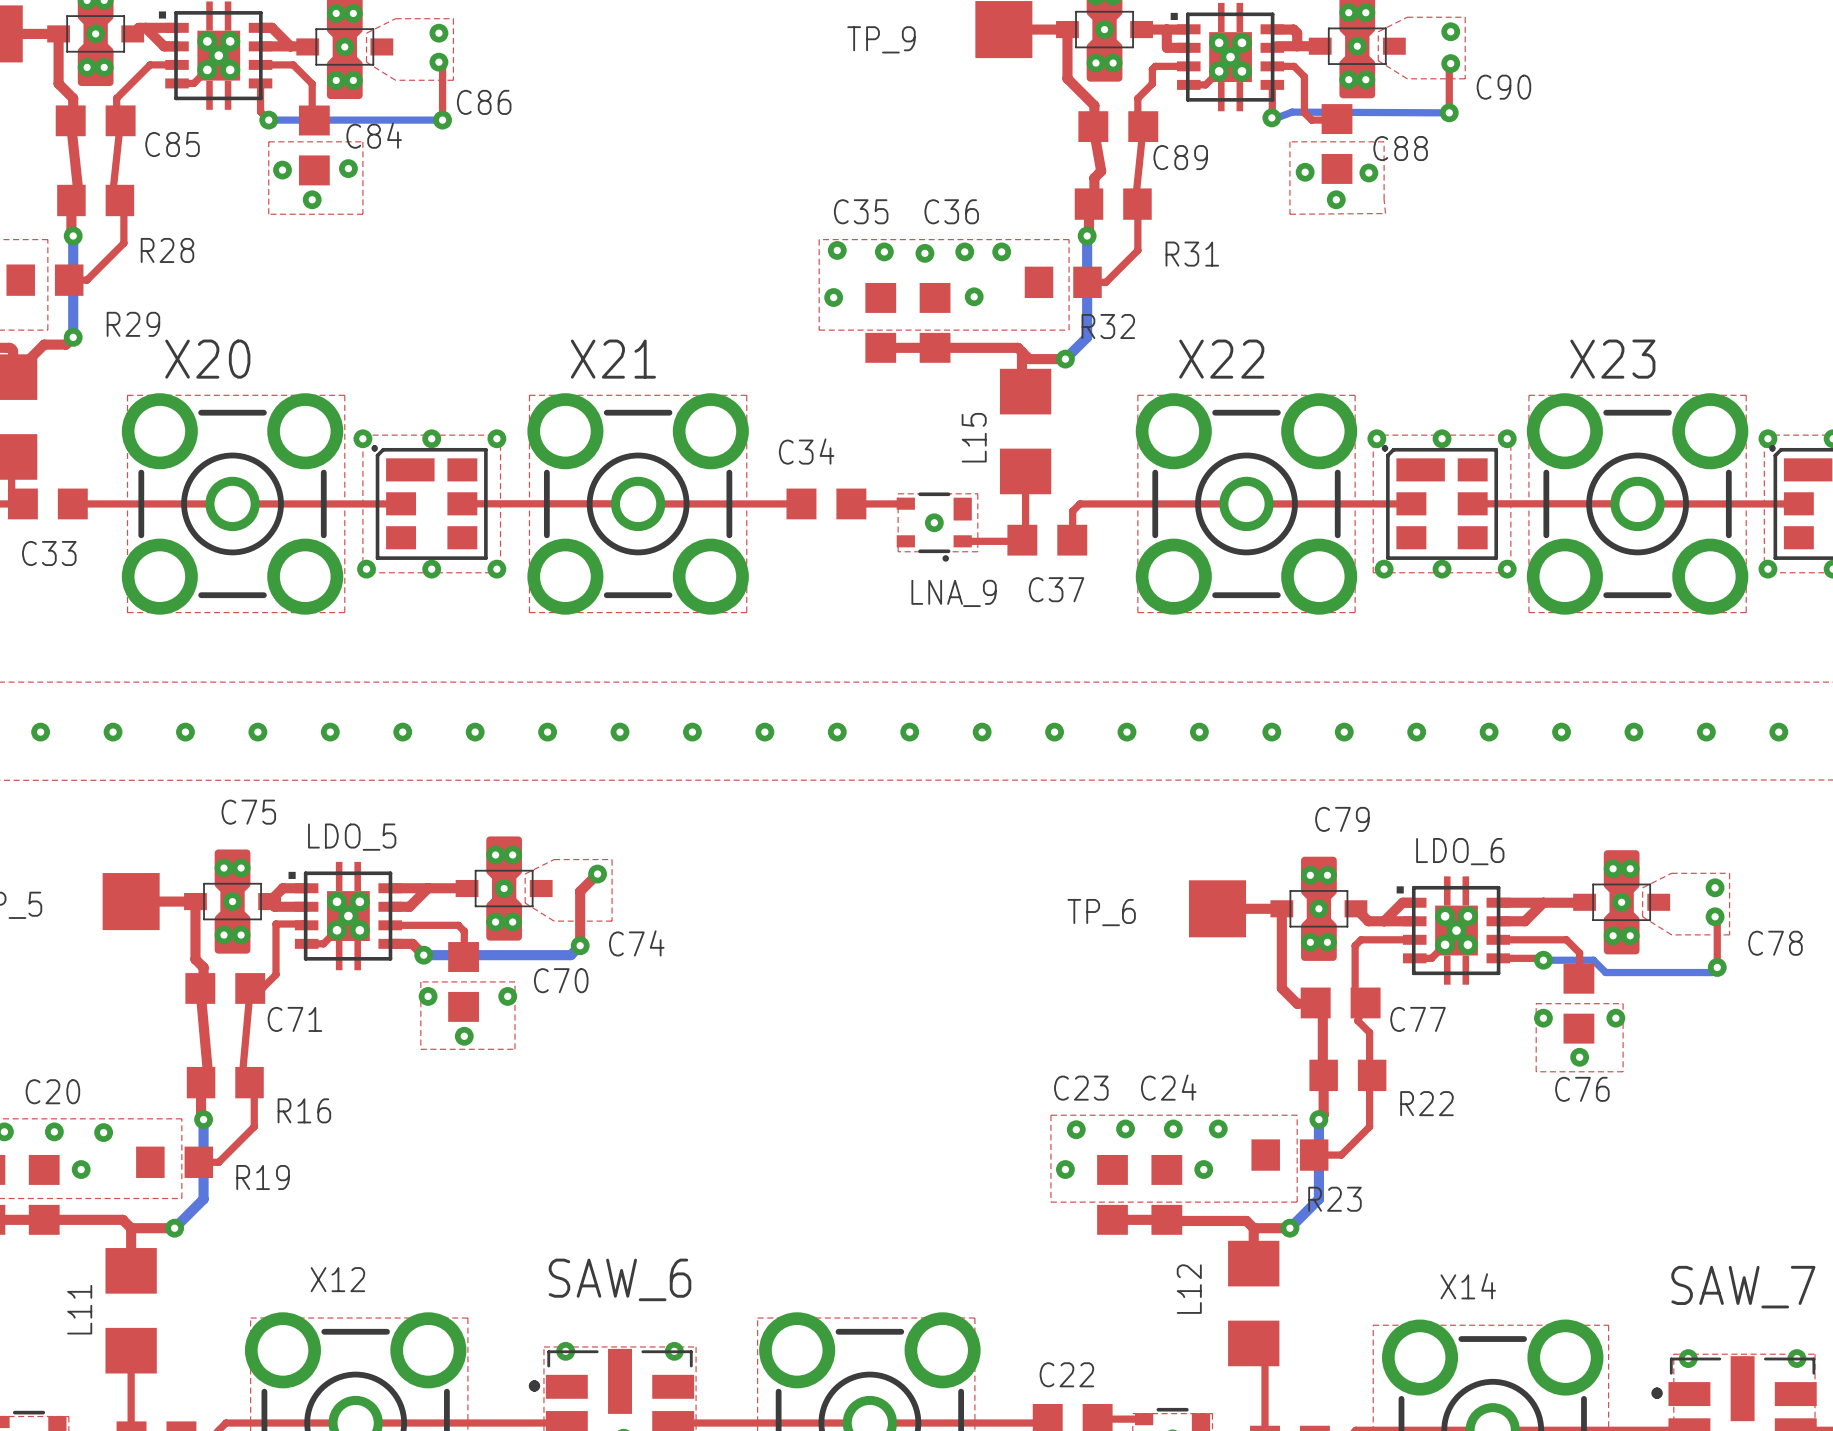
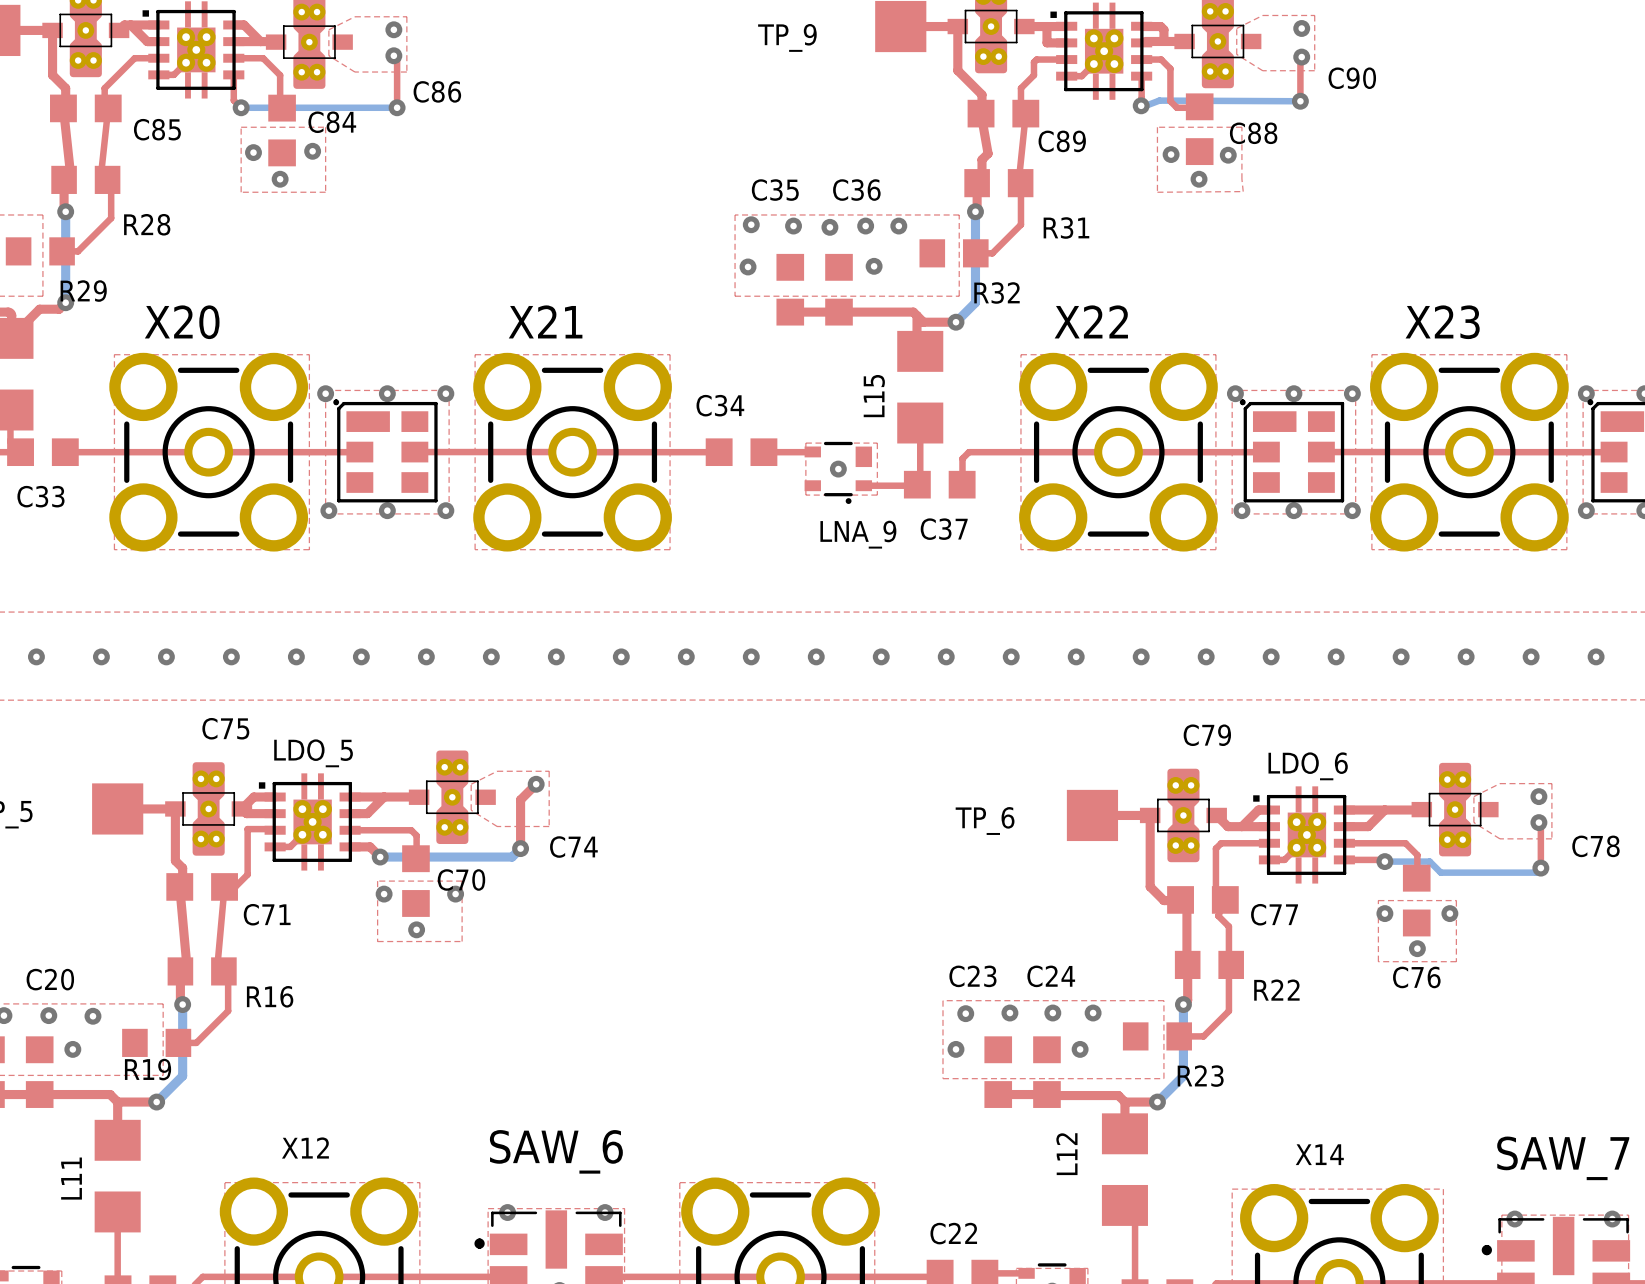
R29 name position: R29 (133, 324) -> R29 (83, 291)
C70 name position: C70 (561, 980) -> C70 (461, 879)
R19 name position: R19 (263, 1177) -> R19 (148, 1069)

